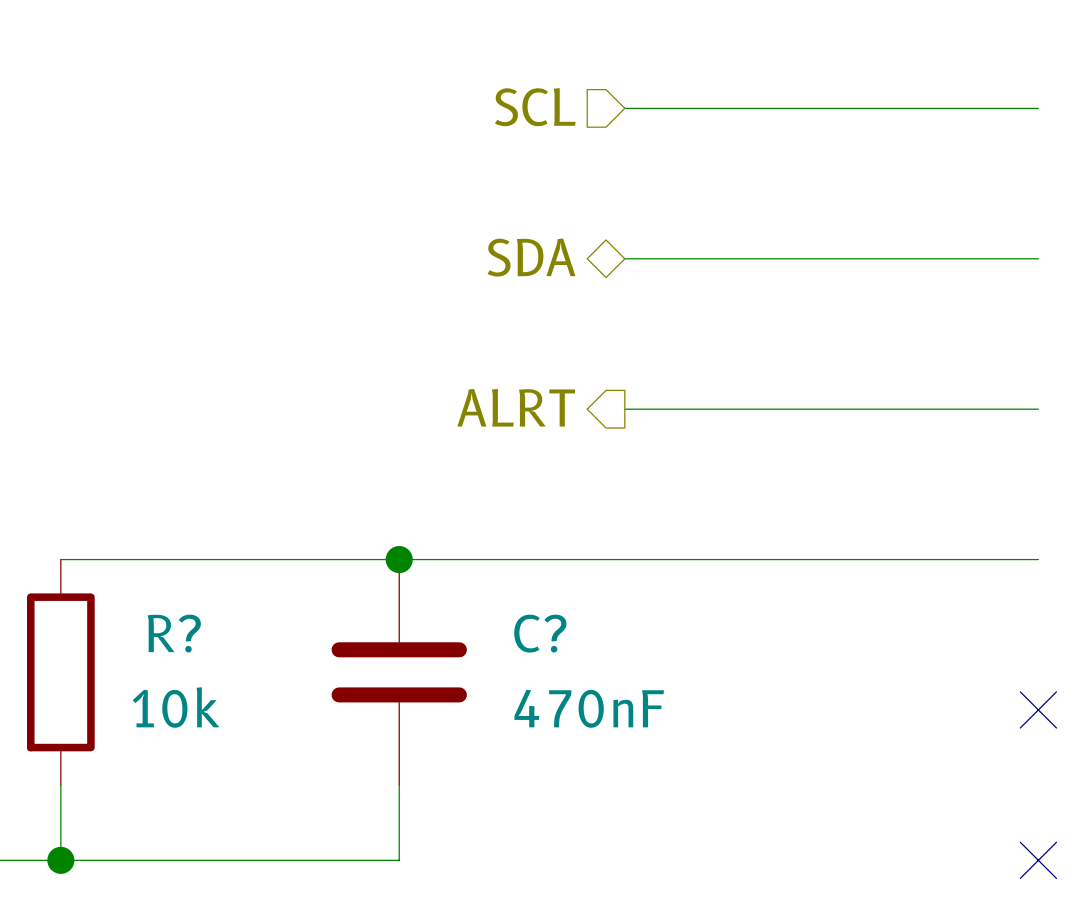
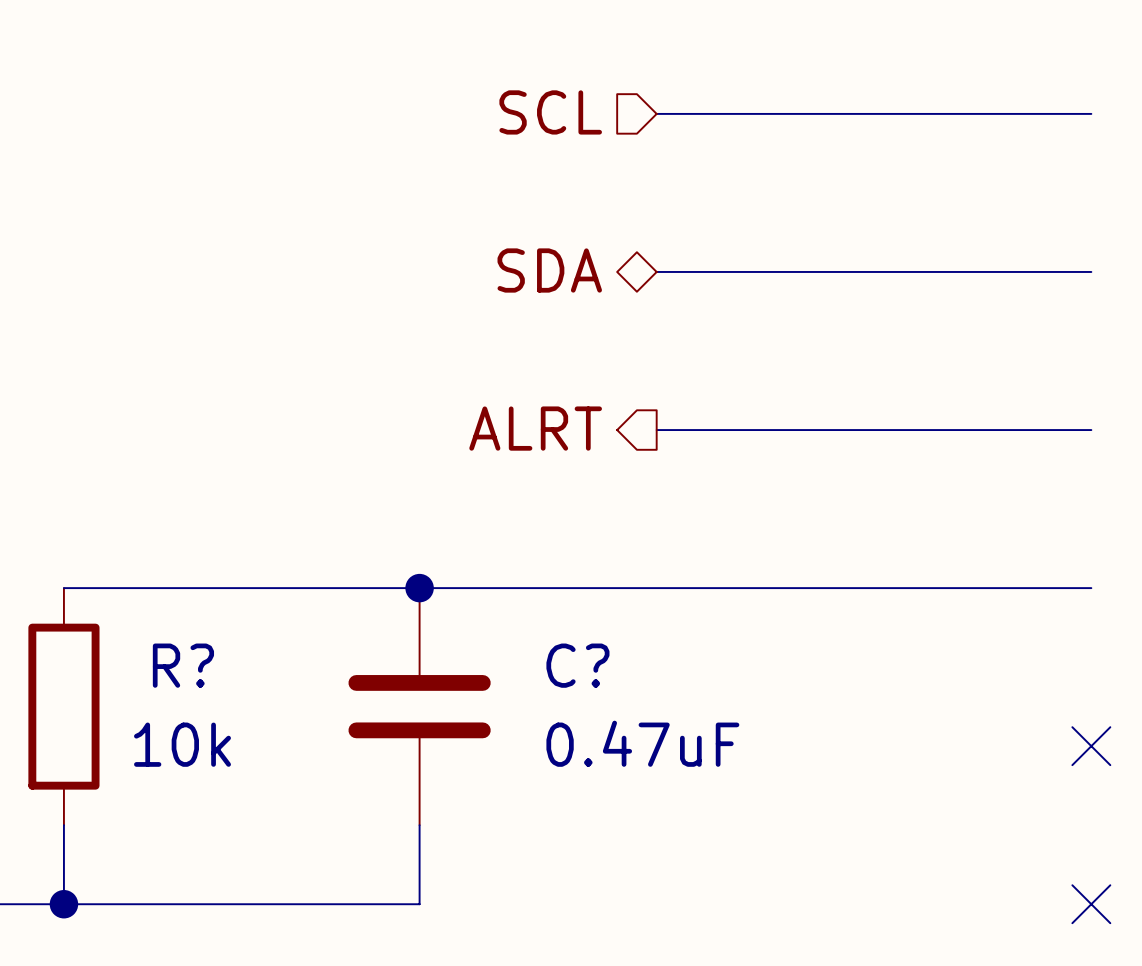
C? value: 470nF (589, 708) -> 0.47uF (642, 743)

